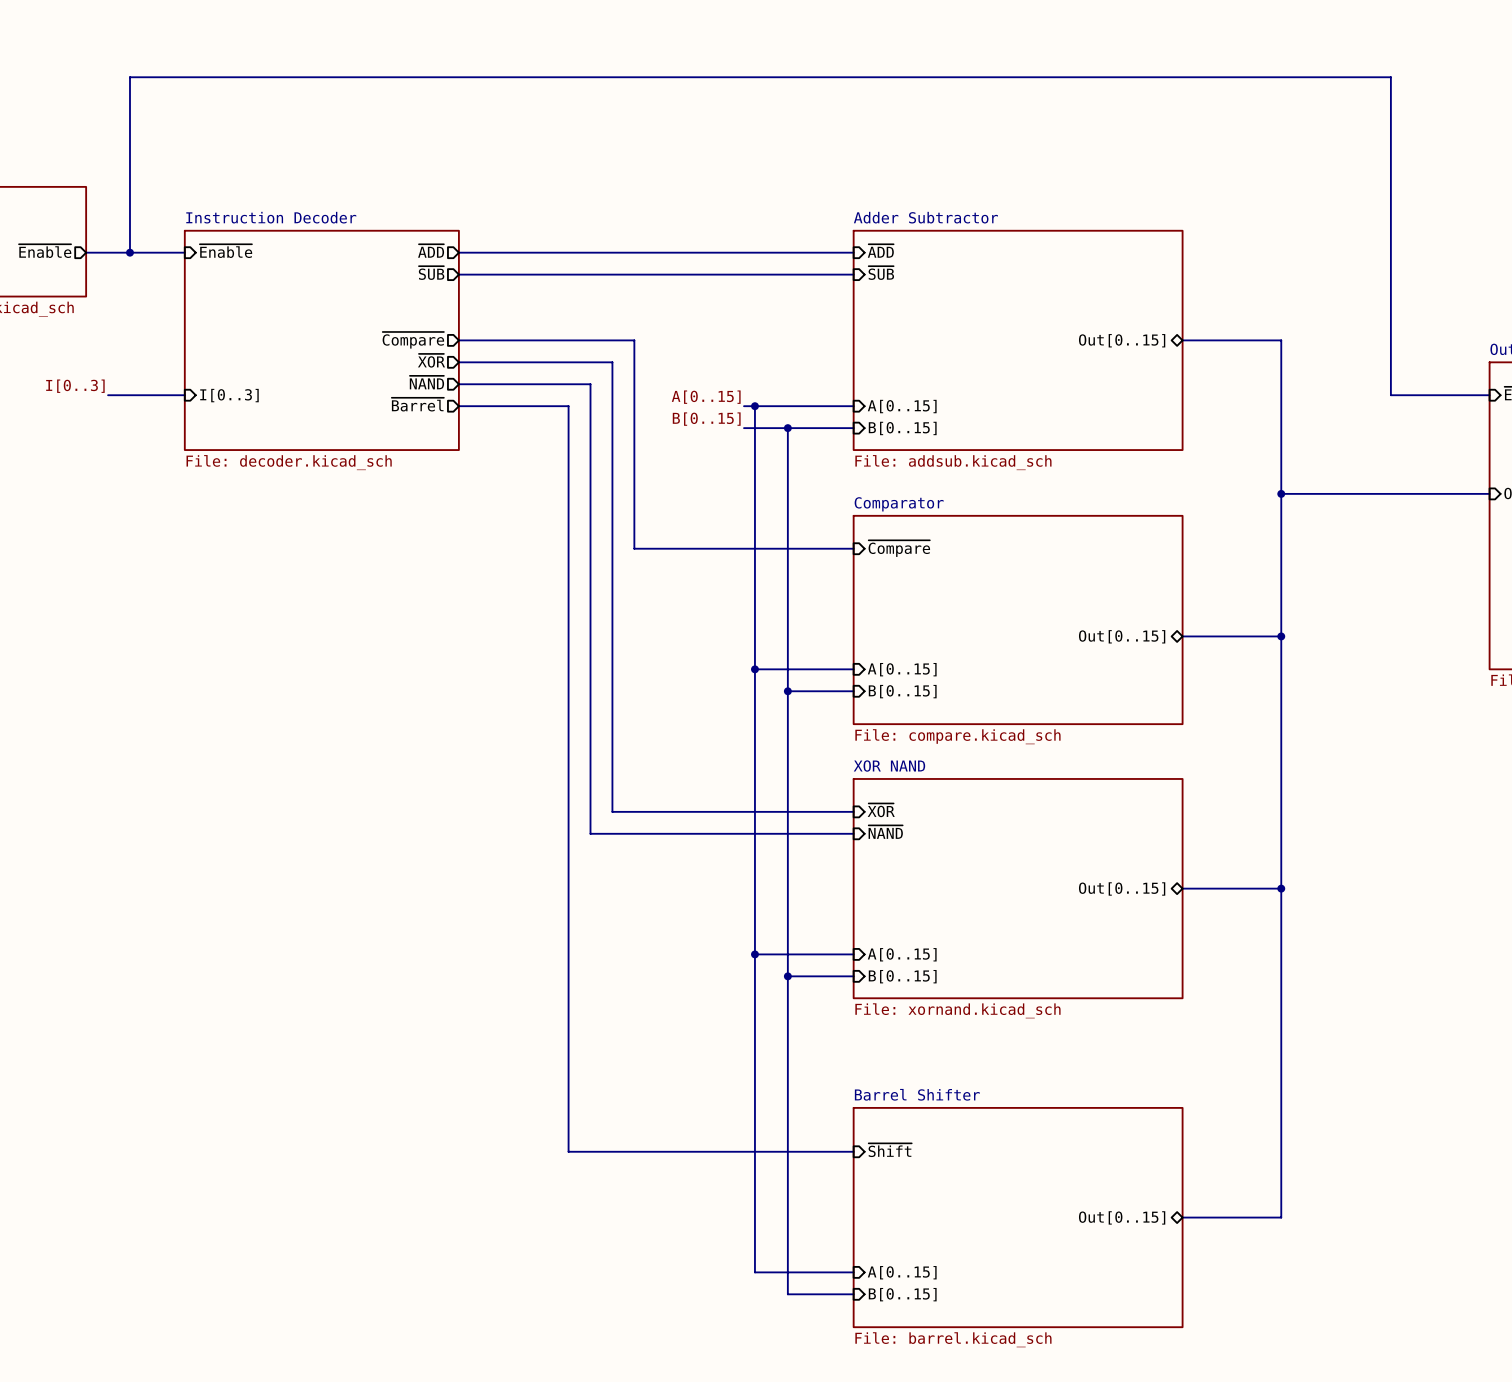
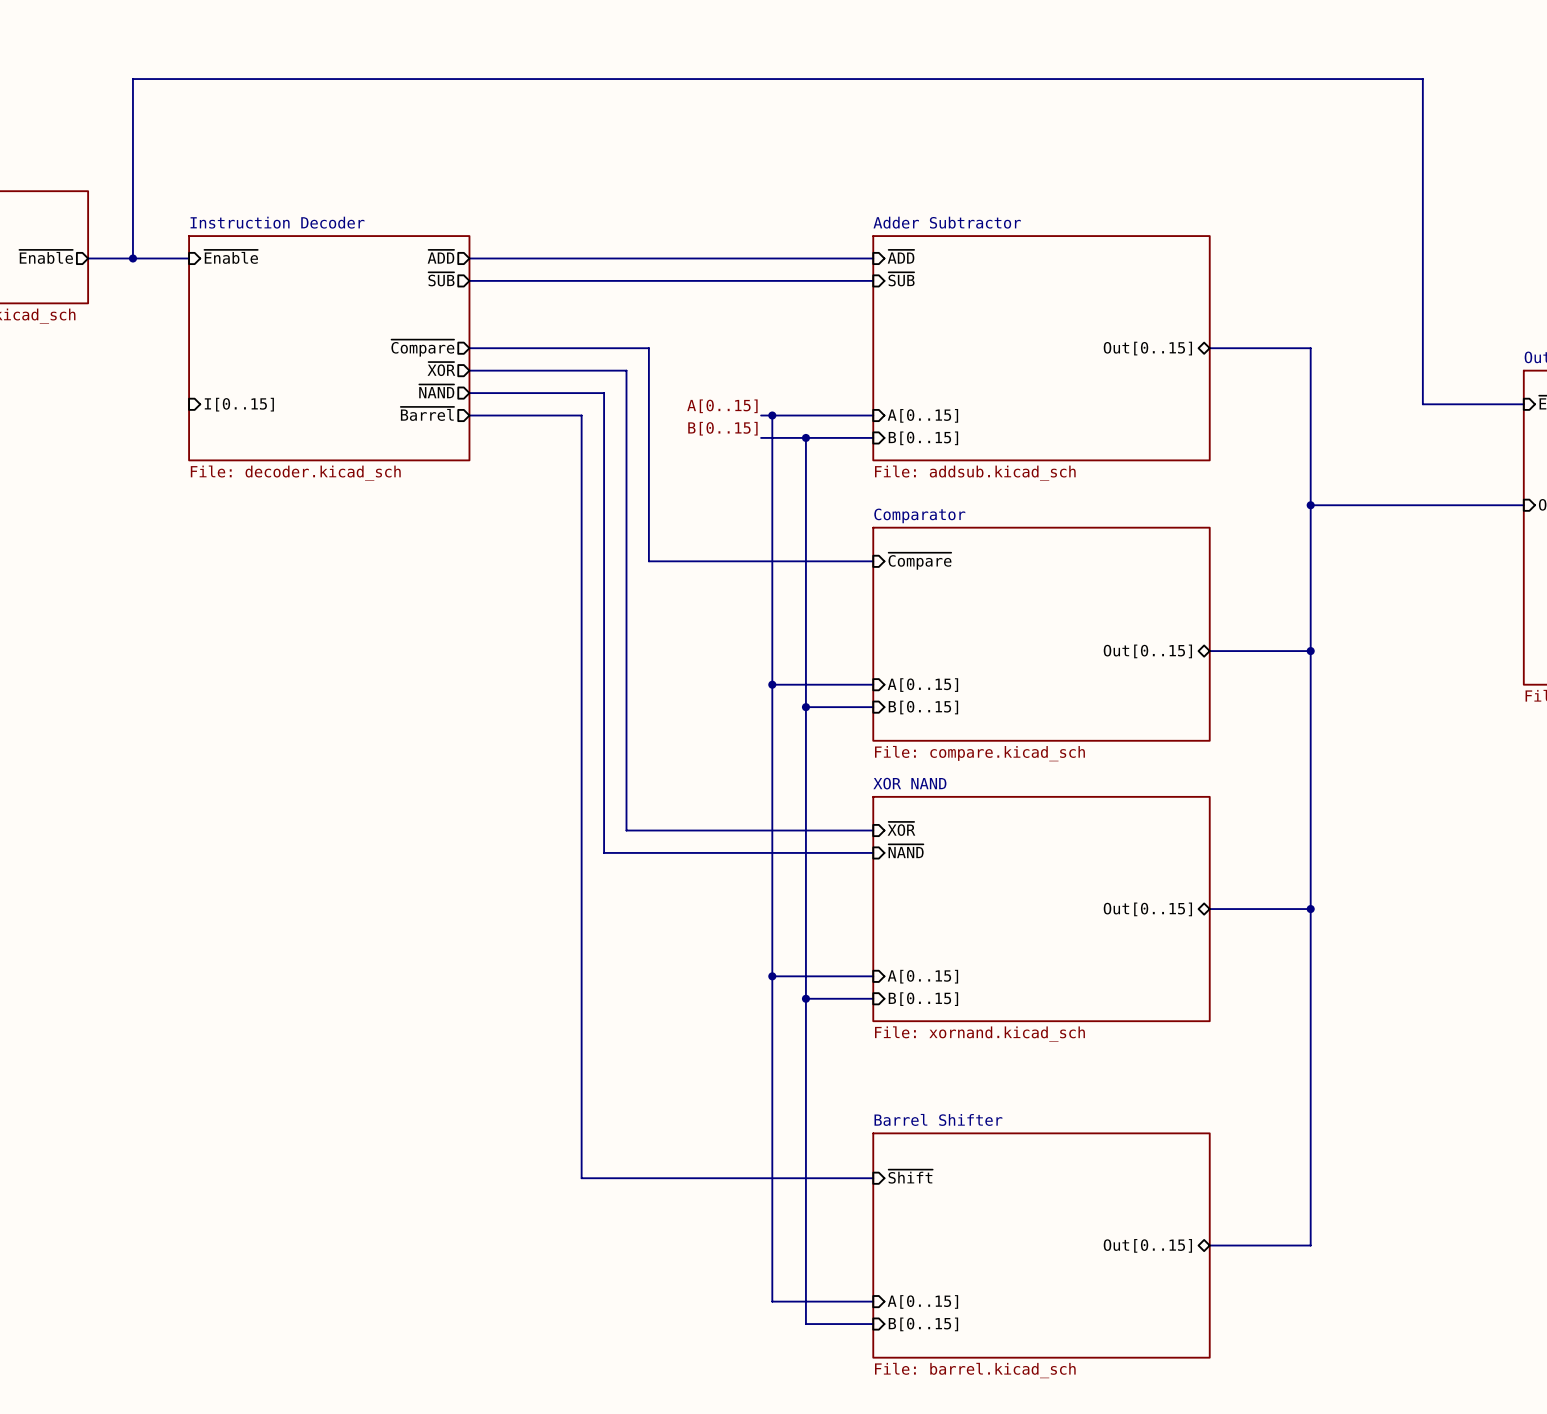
label: I[0..3] (75, 386) -> none
bus: (108, 395) (184, 395) -> none
sheet pin: I[0..3] (229, 395) -> I[0..15] (239, 404)

